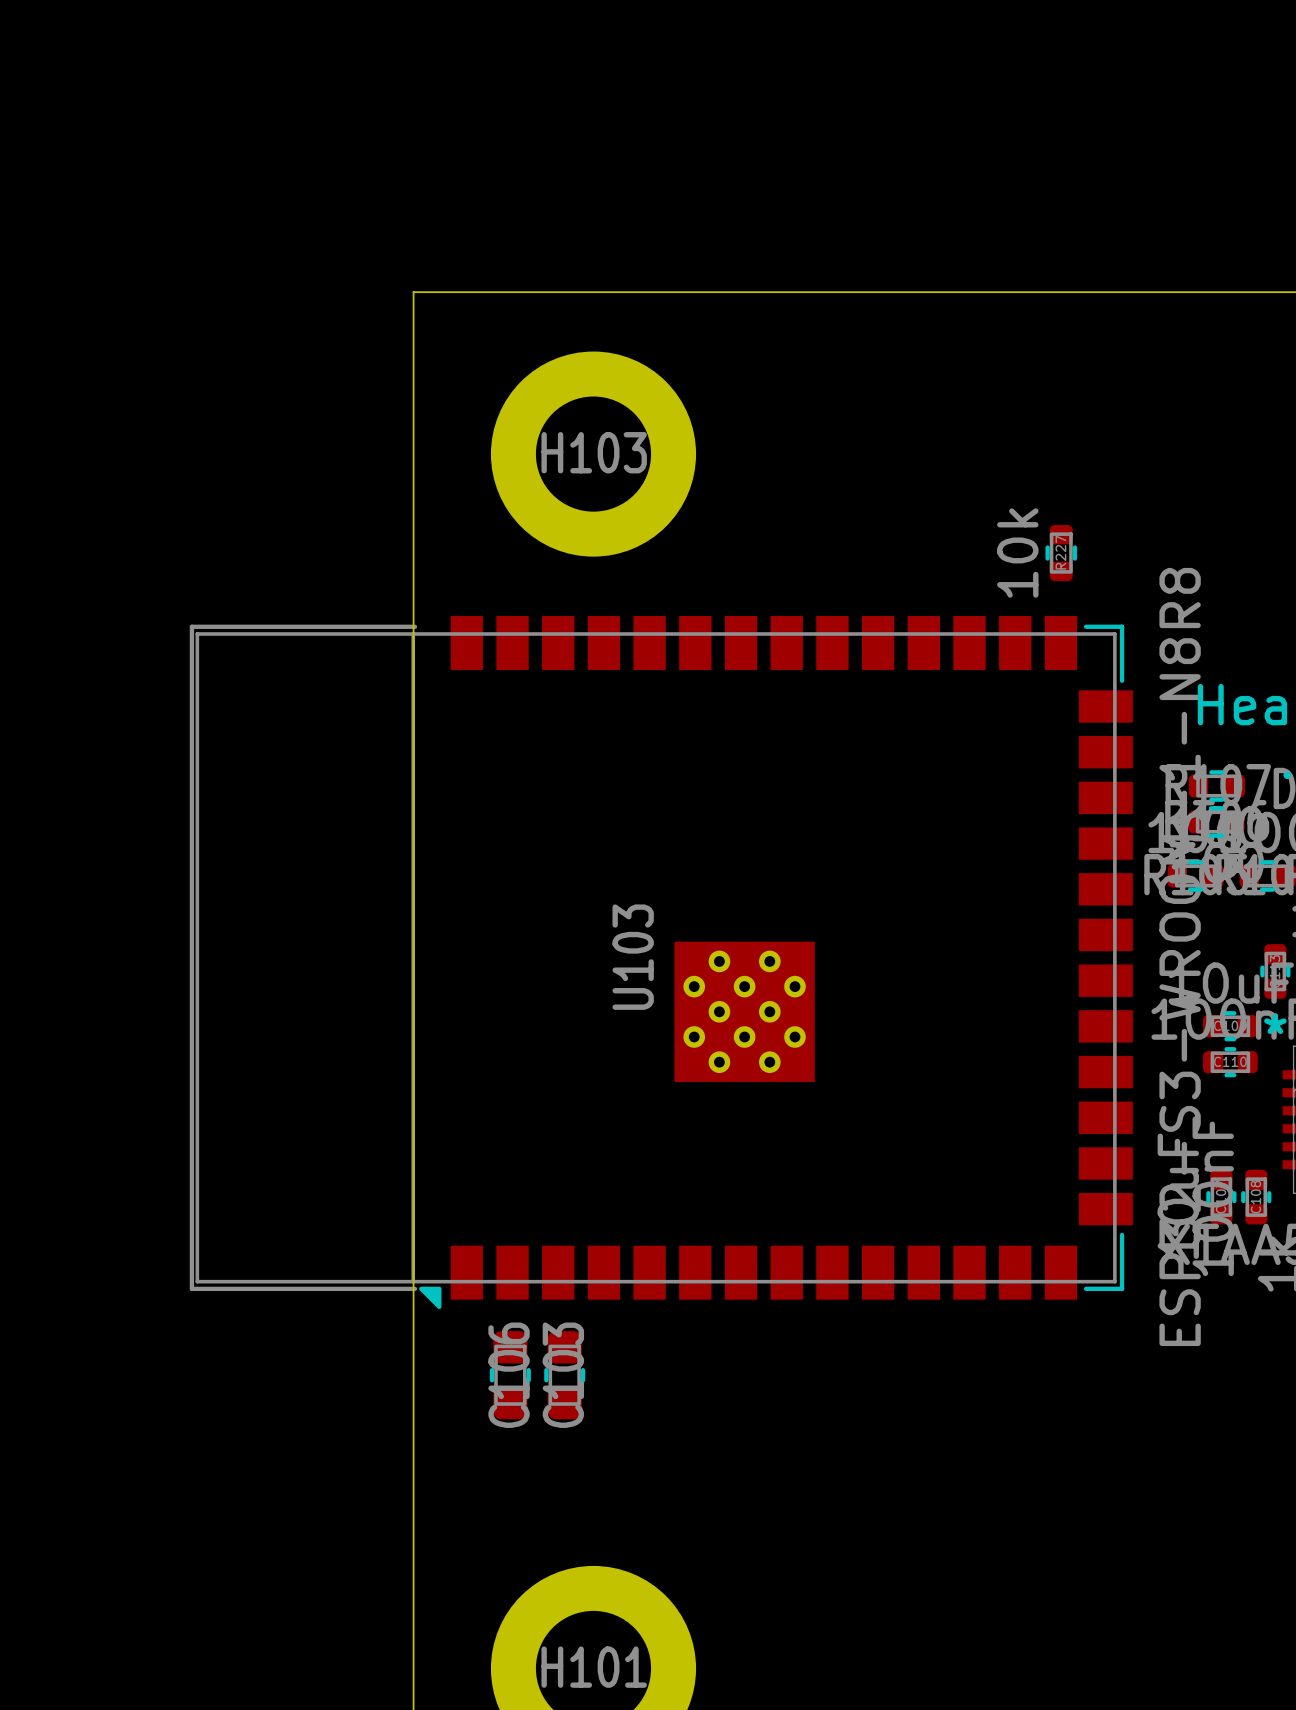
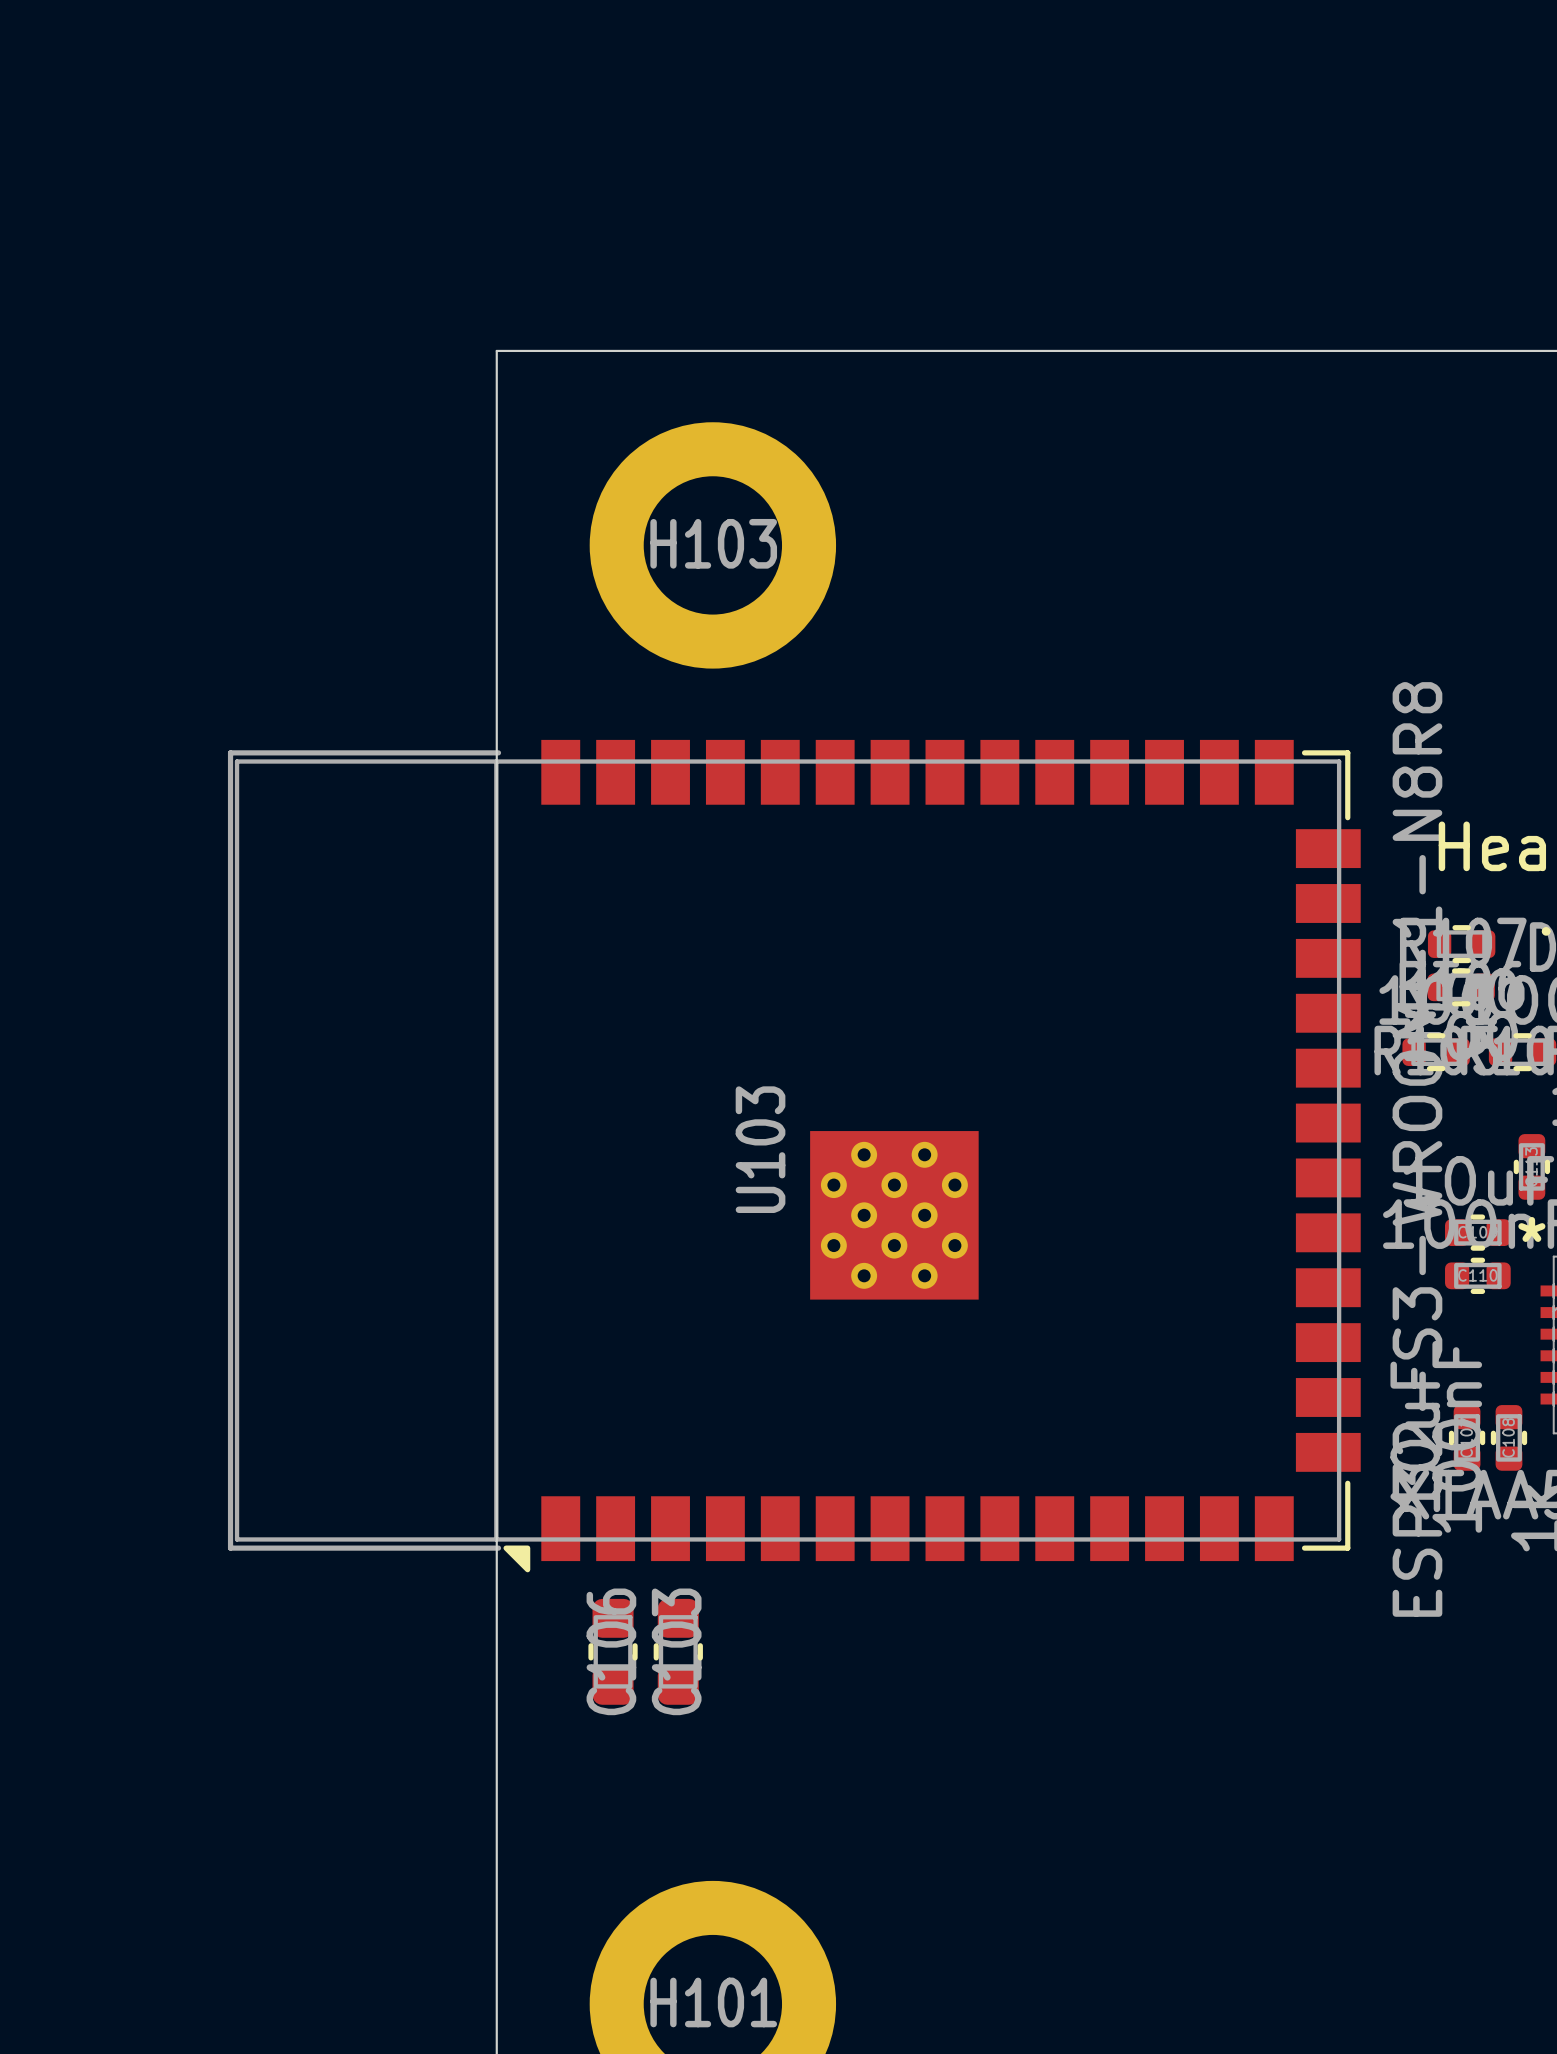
R227: 10k (1061, 553) -> none

